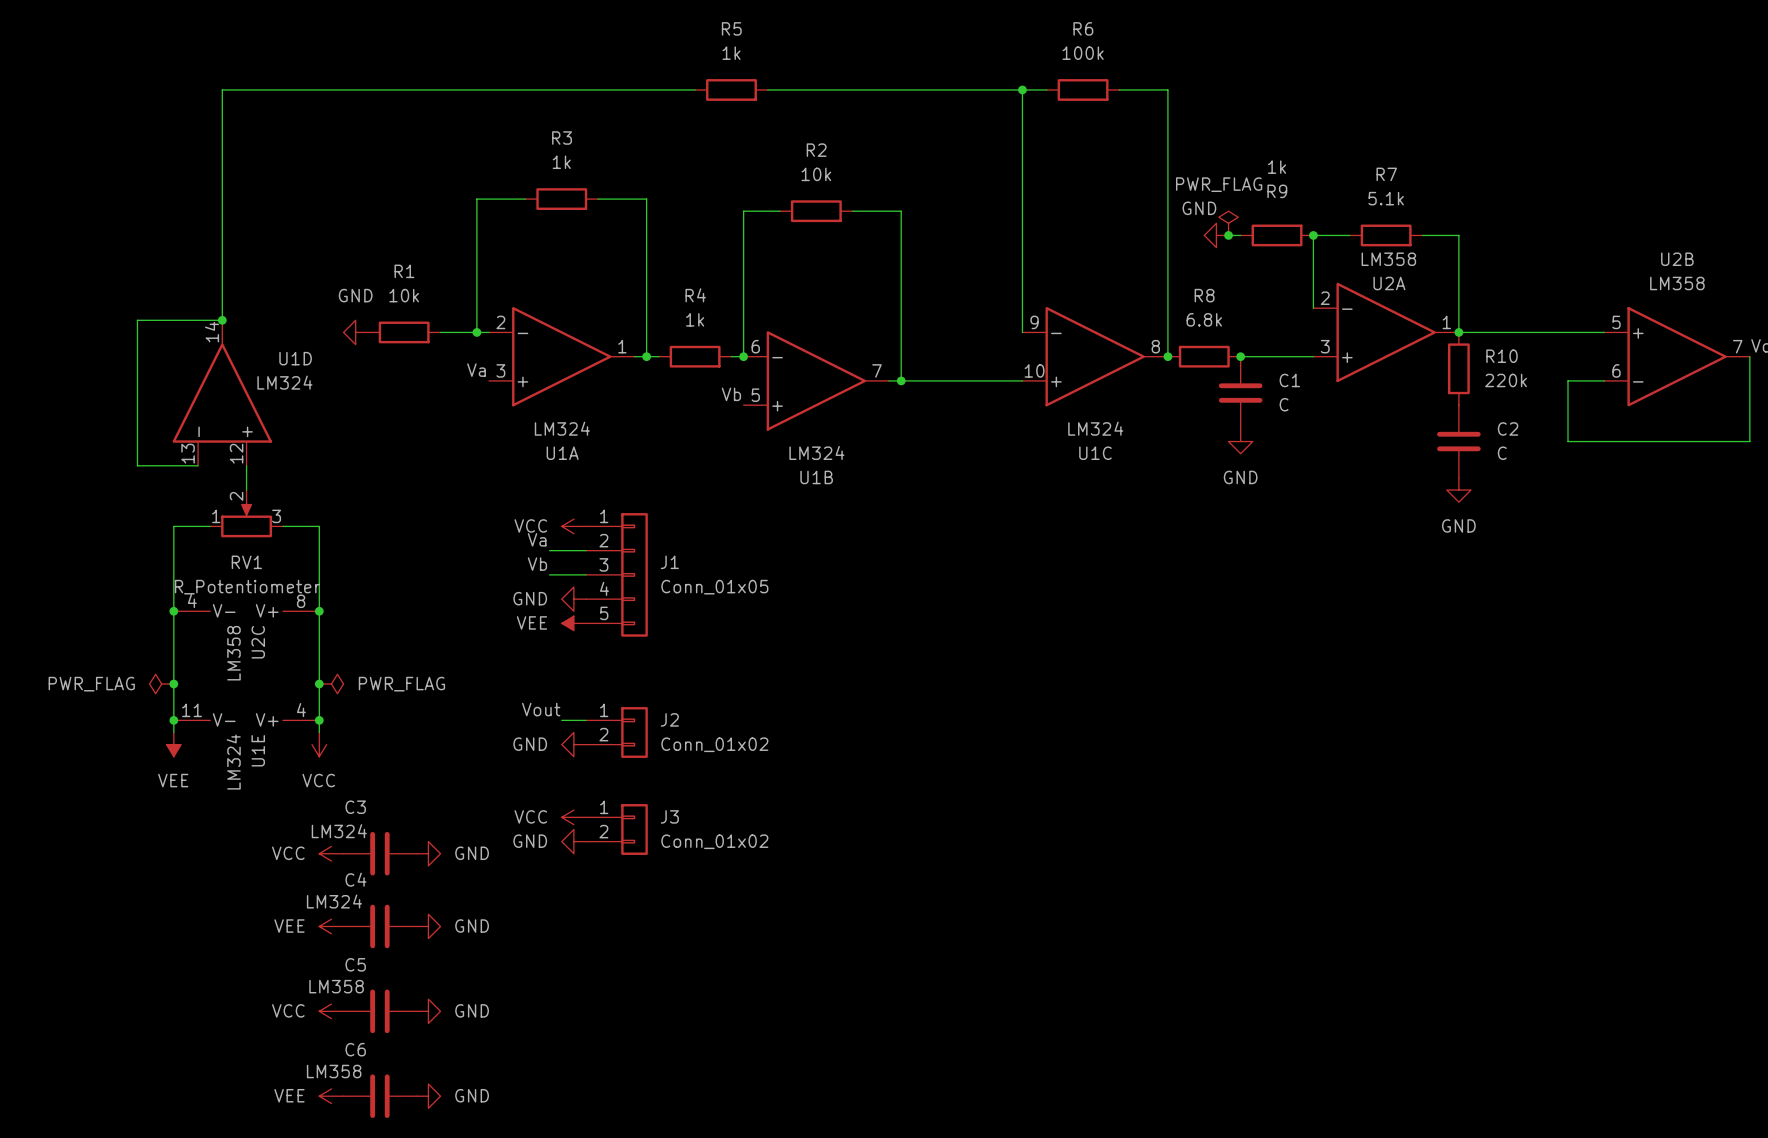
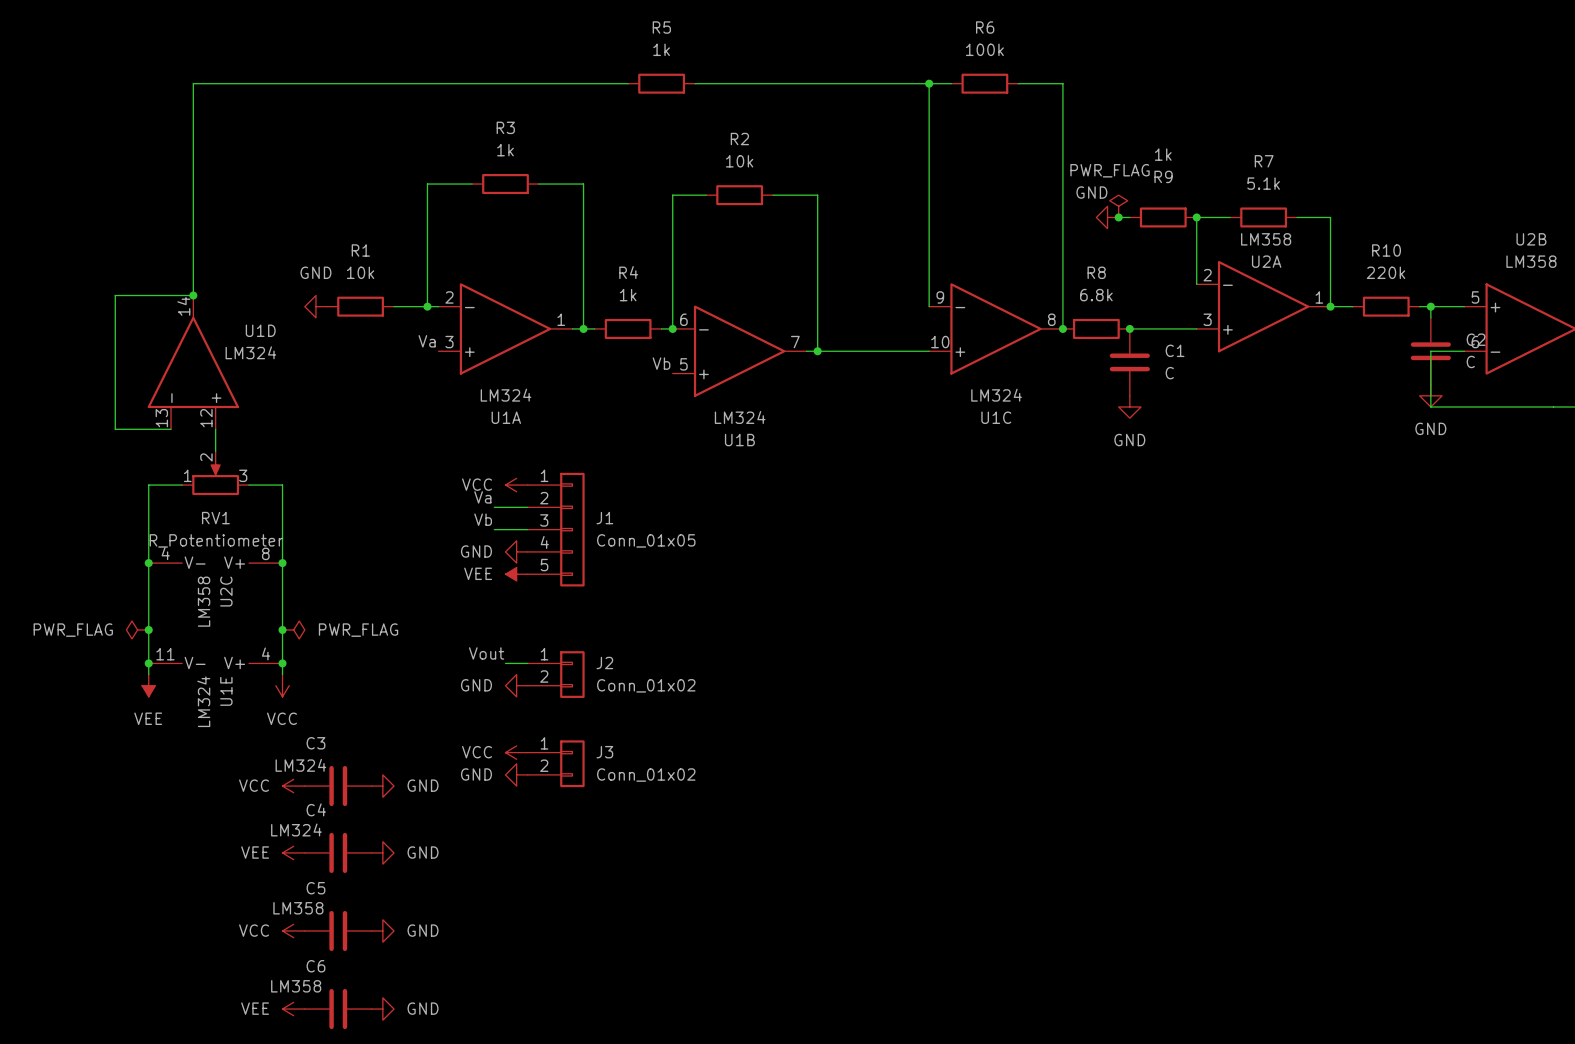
wire: (1483, 332) (1555, 332) -> none
wire: none -> (1430, 306) (1430, 317)
junction: none -> (1430, 306)
R10 name position: R10 (1501, 356) -> R10 (1386, 250)
R10 rotation: 0° (1458, 368) -> 90° clockwise (1386, 306)
R10 position: (1458, 368) -> (1386, 306)
R10 value position: 220k (1506, 380) -> 220k (1385, 272)
C2 position: (1458, 441) -> (1430, 351)
power symbol position: GND (1458, 490) -> GND (1430, 395)

